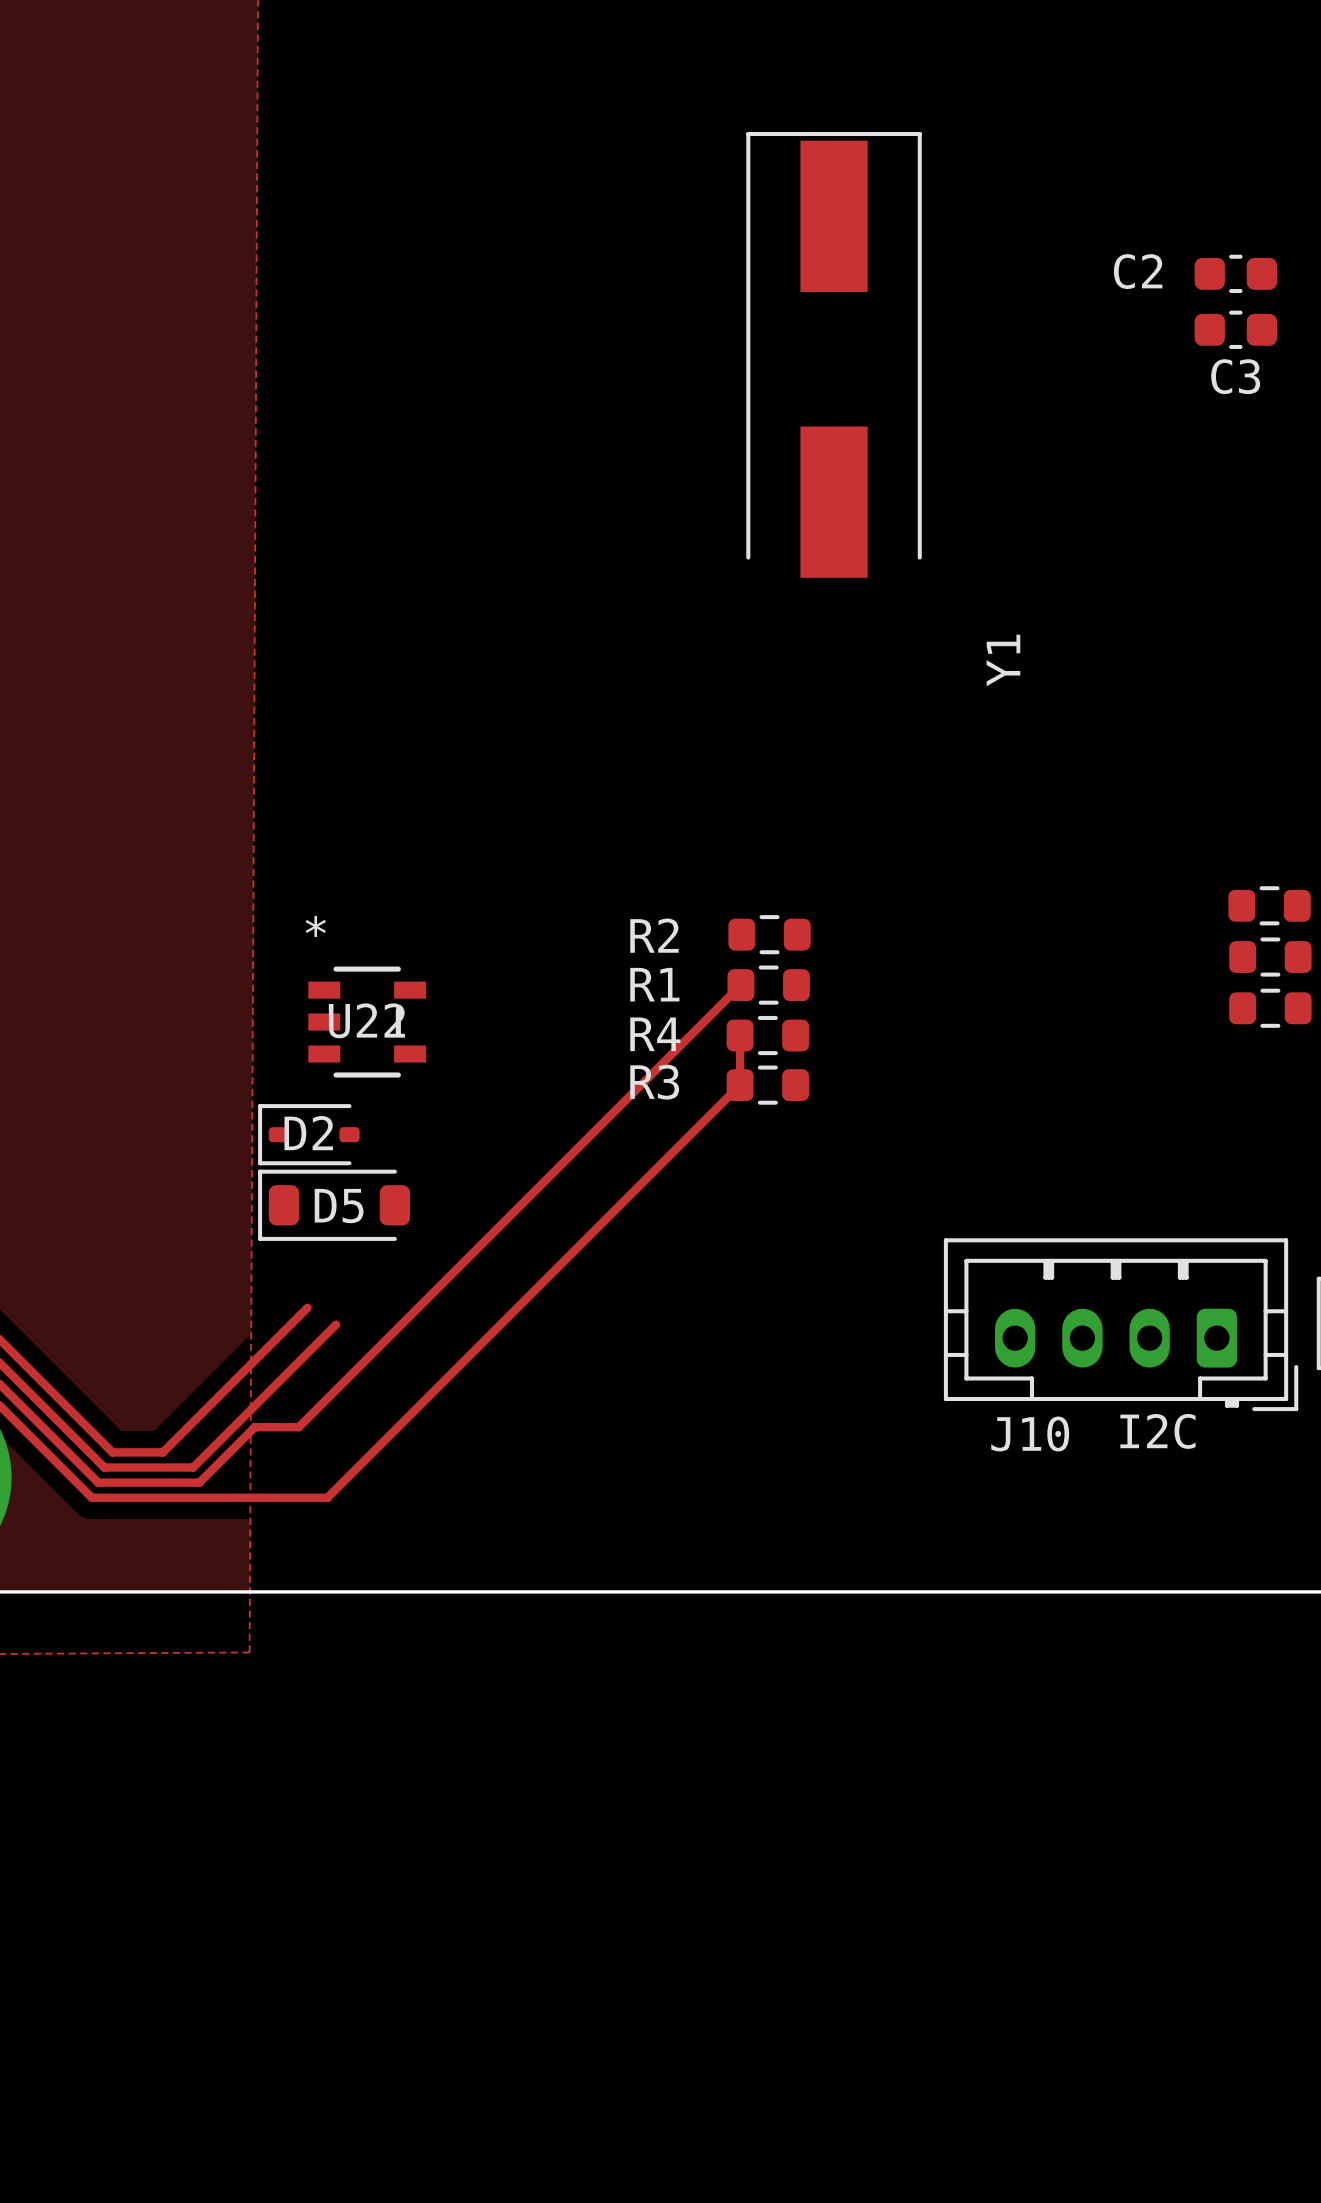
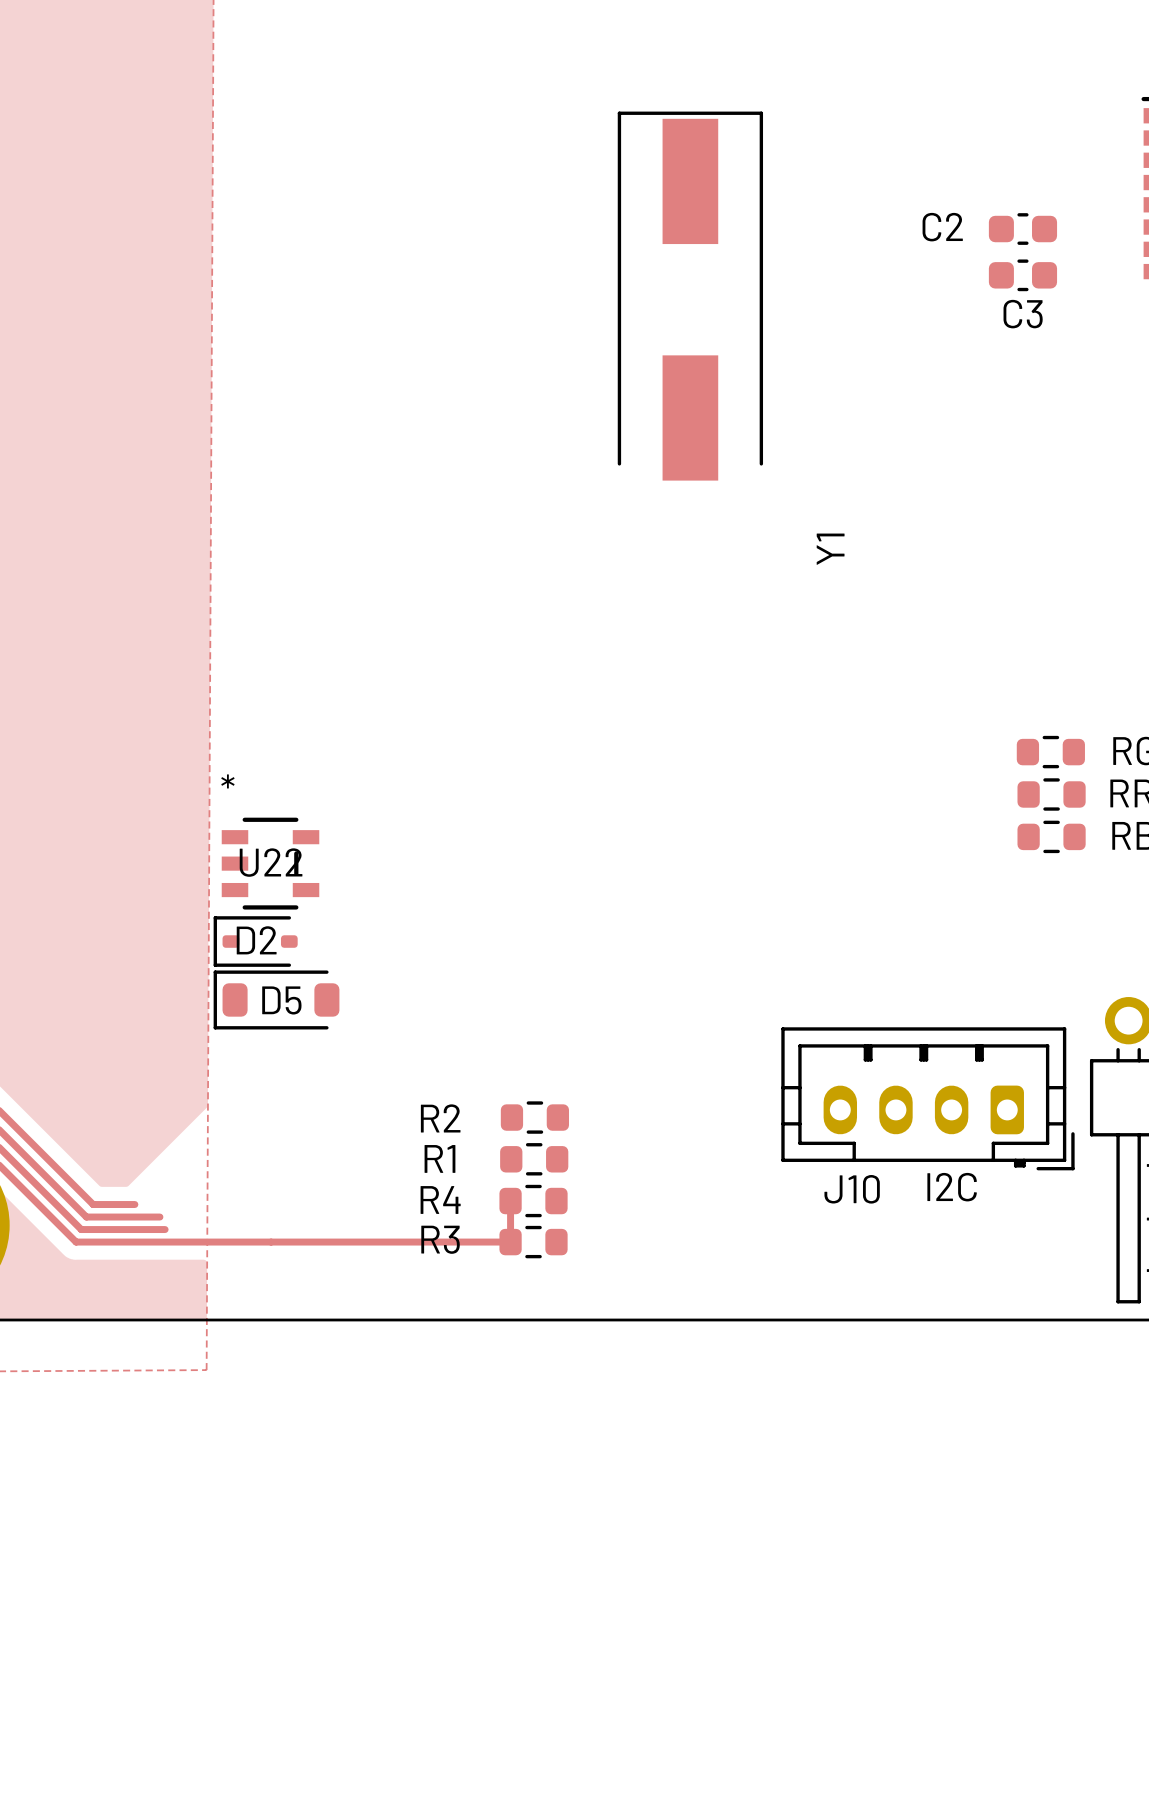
R2 position: (769, 934) -> (534, 1117)
track: (740, 985) (298, 1427) (254, 1427) (199, 1482) -> none
R1 position: (768, 985) -> (534, 1159)
U22 position: (367, 1022) -> (270, 863)
track: (740, 1035) (740, 1085) (327, 1497) -> (510, 1201) (510, 1242) (271, 1242)
R4 position: (767, 1035) -> (533, 1201)
R3 position: (767, 1085) -> (533, 1242)
track: (307, 1307) (162, 1452) -> none
track: (336, 1324) (193, 1467) -> none

